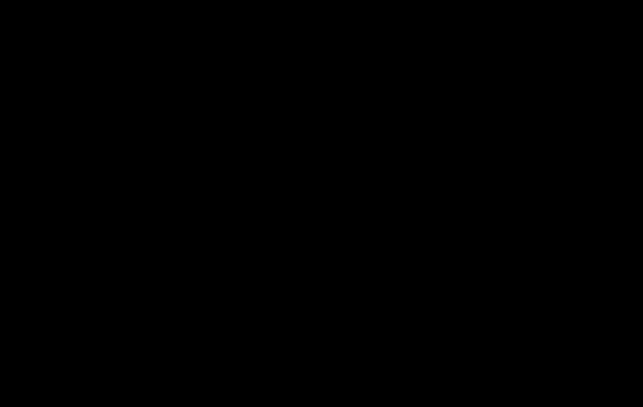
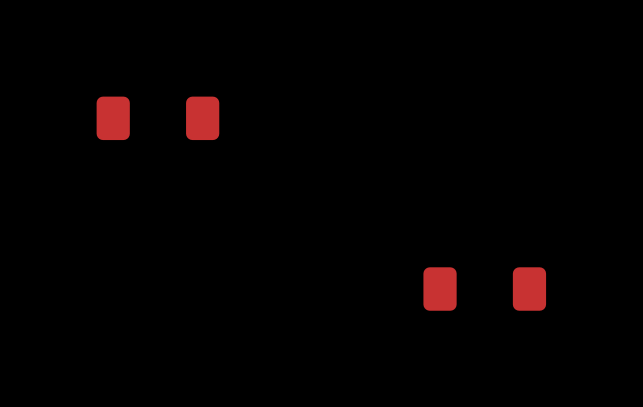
part: none -> (157, 118)
part: none -> (484, 289)

